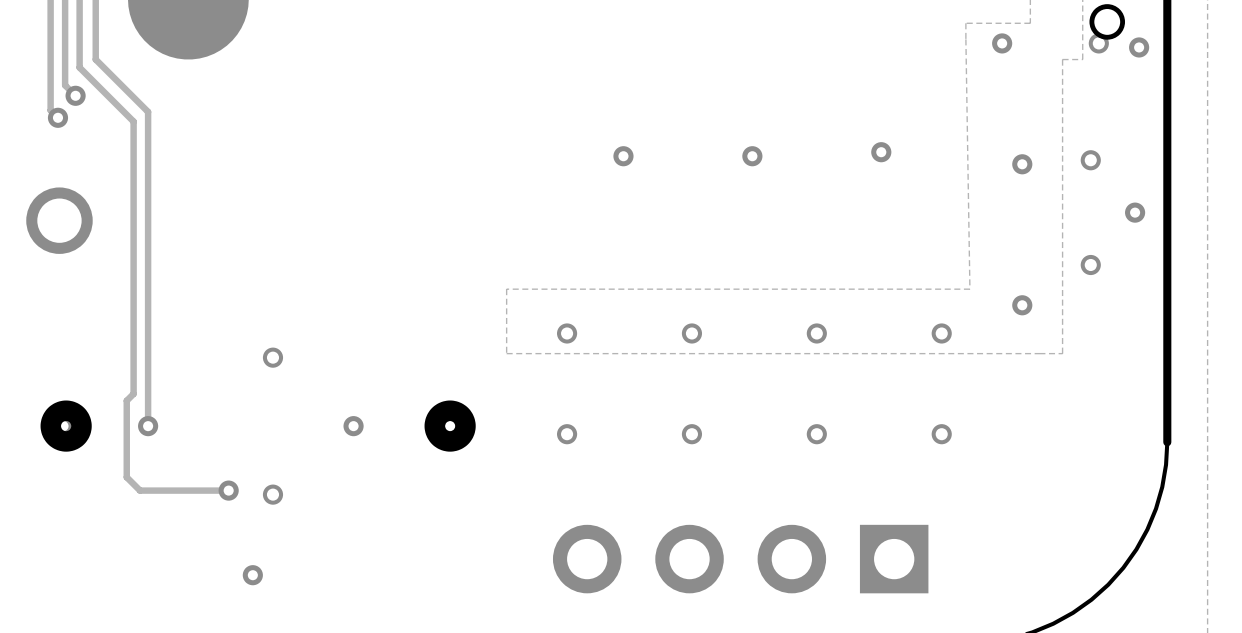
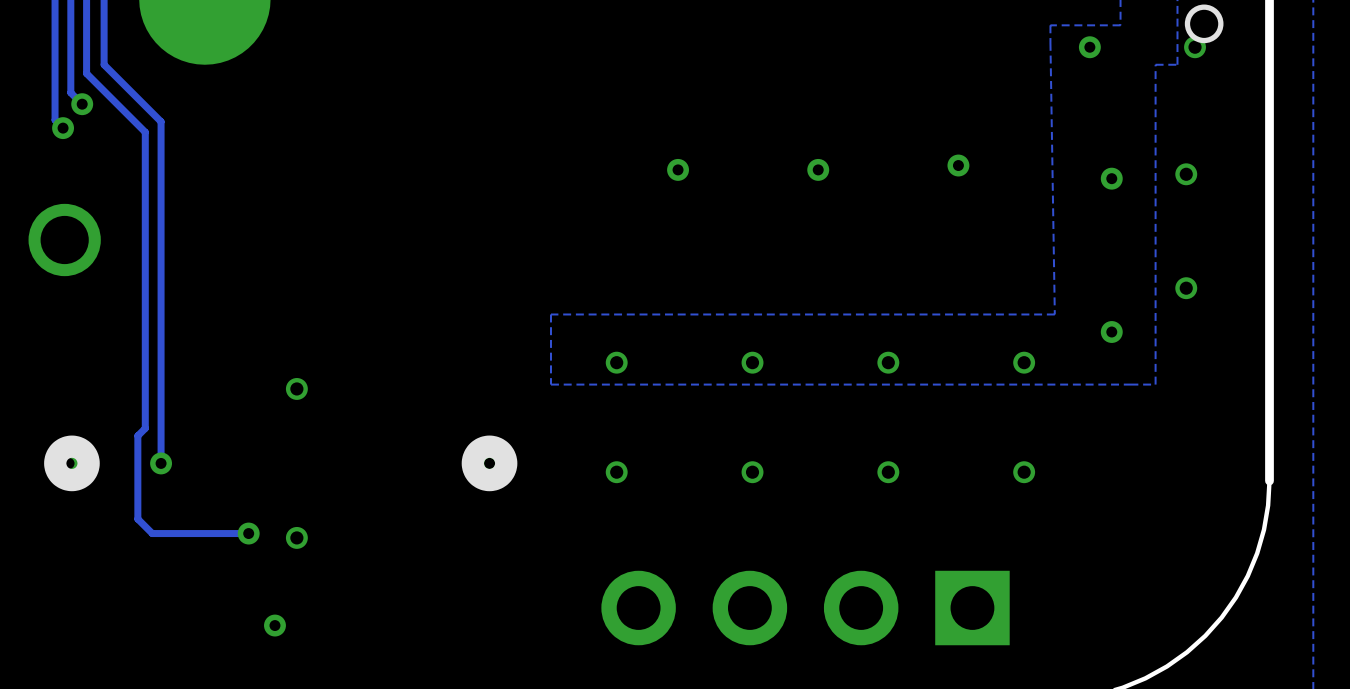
via: (1139, 47) -> none
via: (1135, 212) -> none
via: (353, 426) -> none

